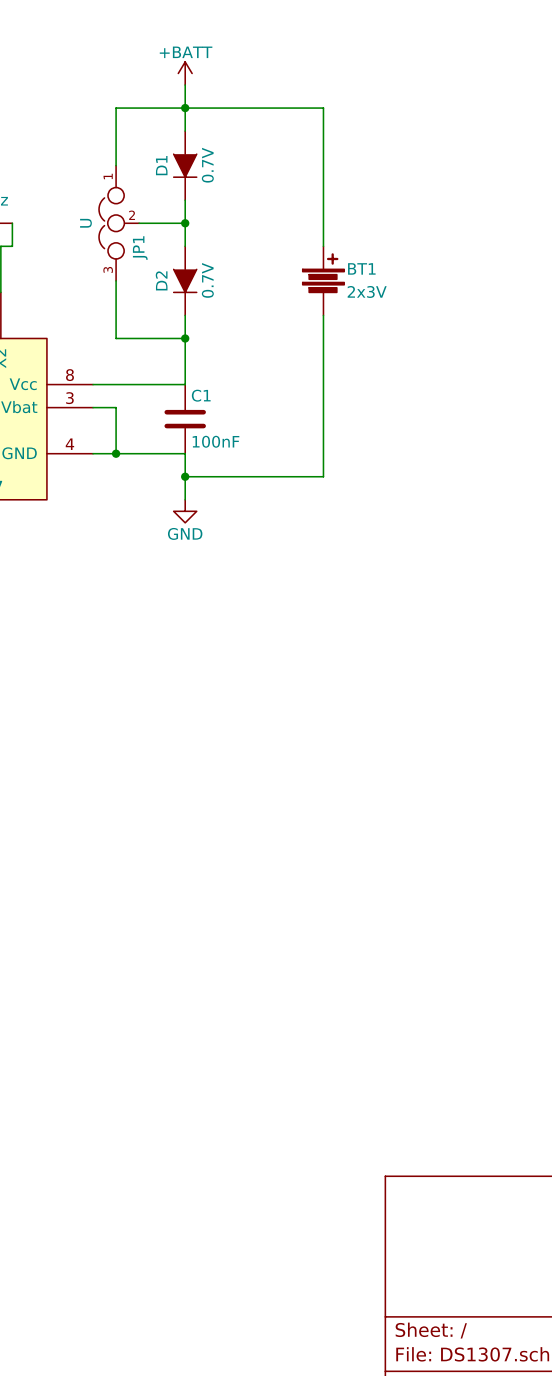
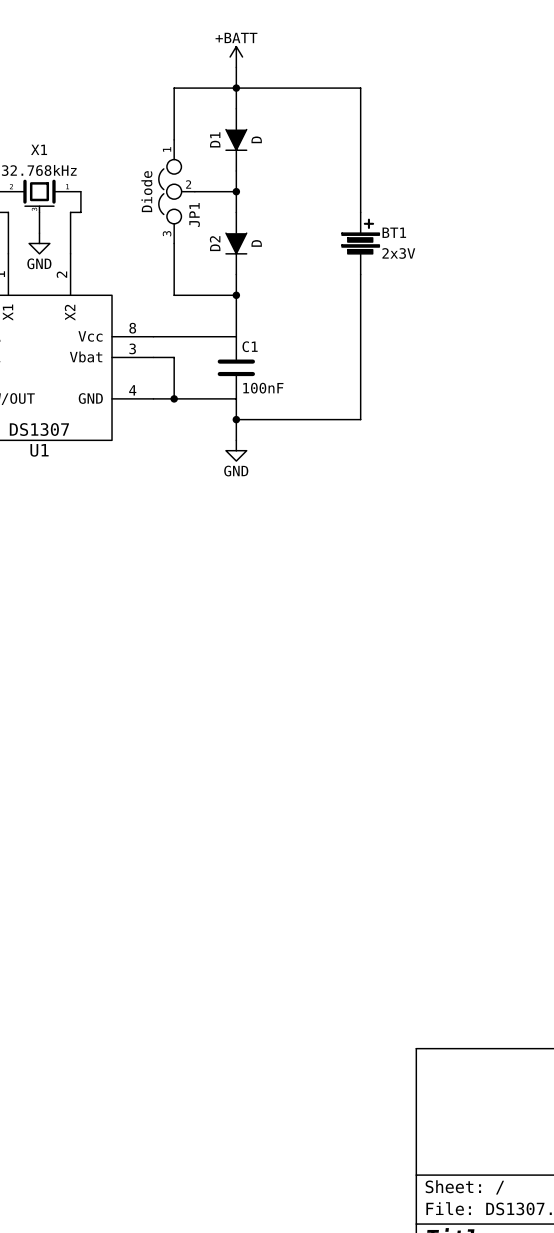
D1 value: 0.7V (207, 165) -> D (256, 139)
JP1 value: U (85, 223) -> Diode (146, 191)
D2 value: 0.7V (207, 280) -> D (256, 243)

